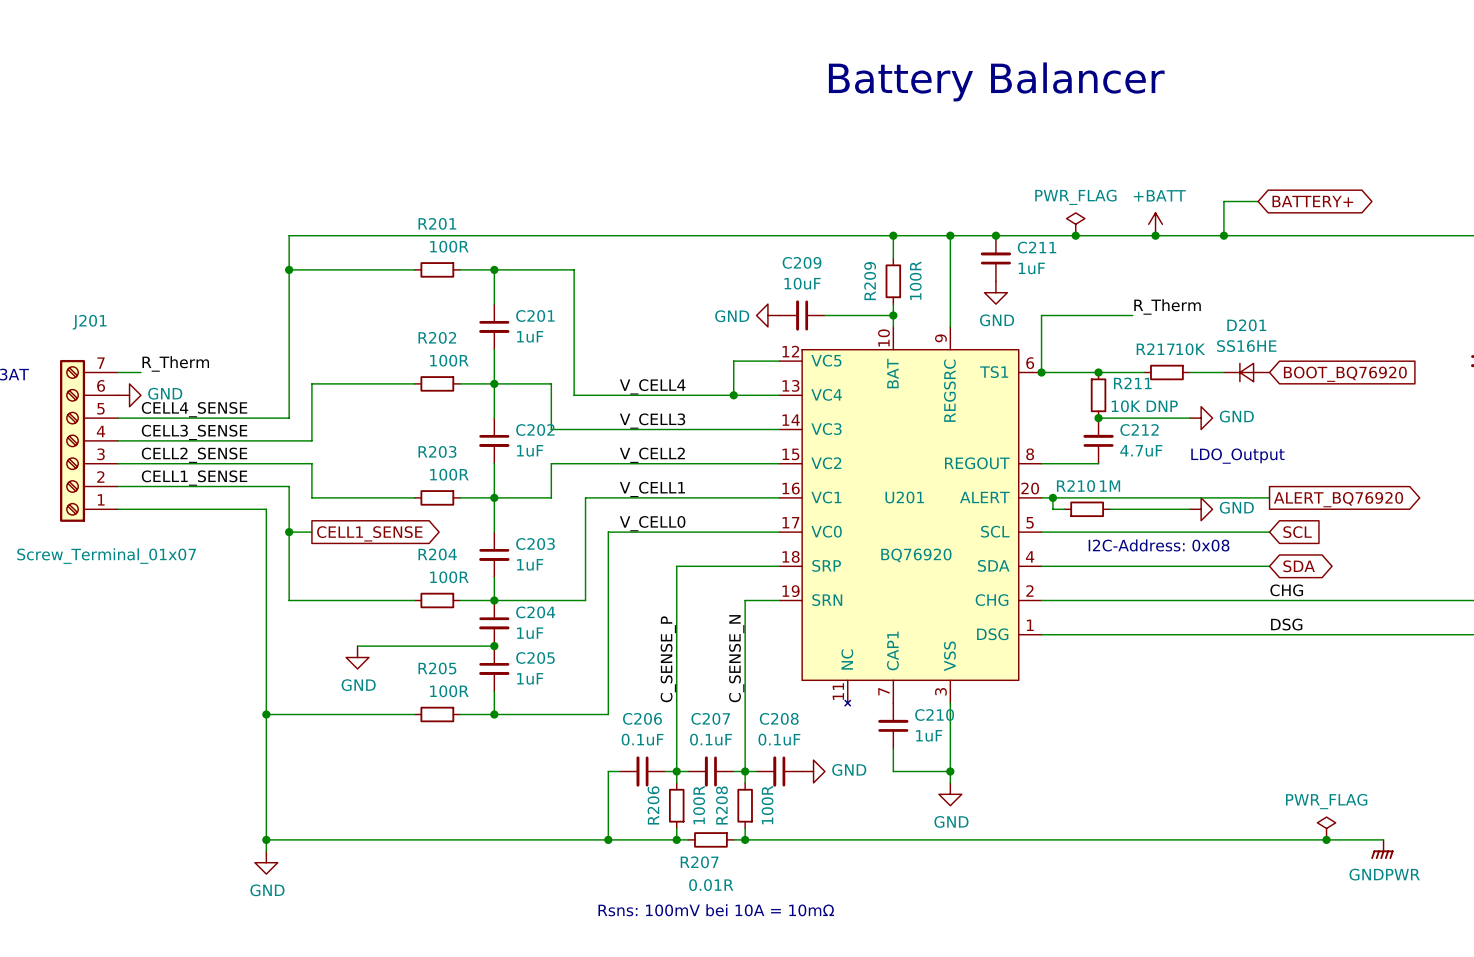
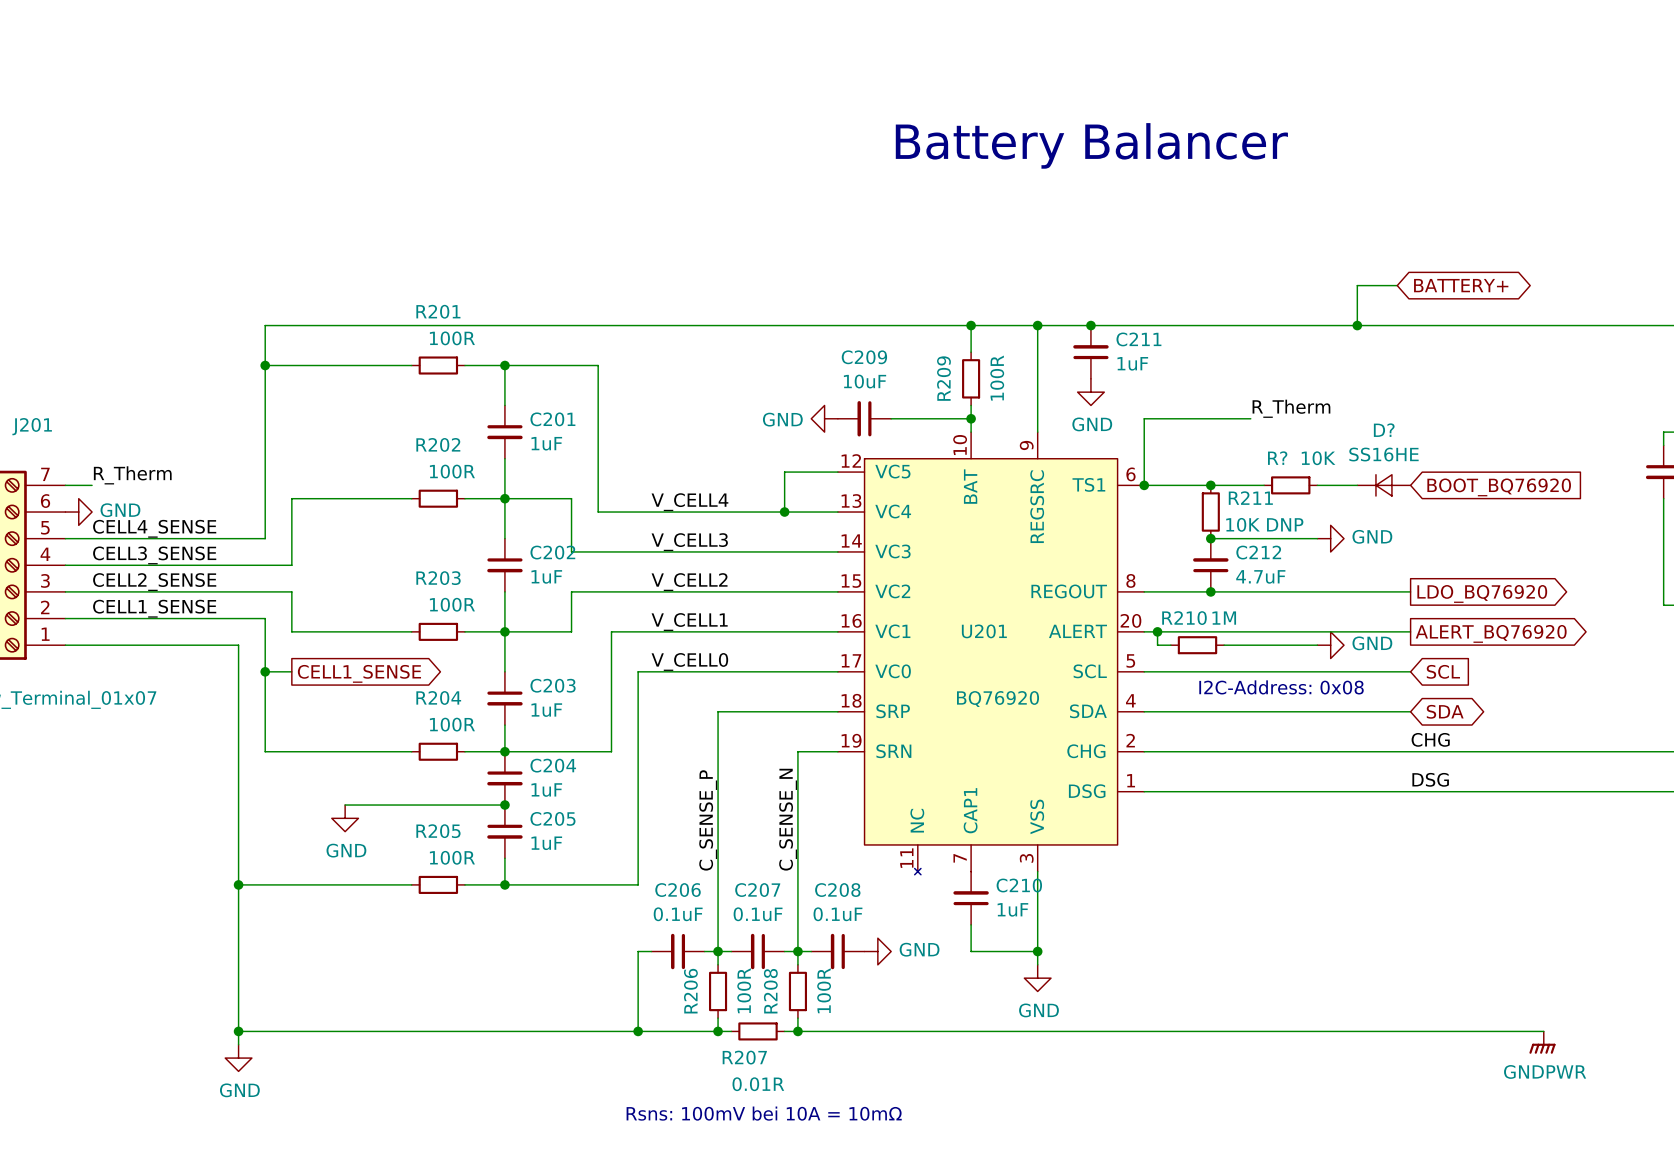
power symbol: PWR_FLAG (1075, 224) -> none
power symbol: +BATT (1155, 224) -> none
junction: (1075, 235) -> none
junction: (1155, 235) -> none
D201 name: D201 (1246, 325) -> D? (1384, 430)
R217 name: R217 (1155, 349) -> R? (1277, 458)
text: LDO_Output (1237, 456) -> none
wire: none -> (1210, 591) (1410, 591)
junction: none -> (1210, 591)
global label: none -> LDO_BQ76920 (1482, 593)
power symbol: PWR_FLAG (1326, 828) -> none
junction: (1326, 839) -> none

